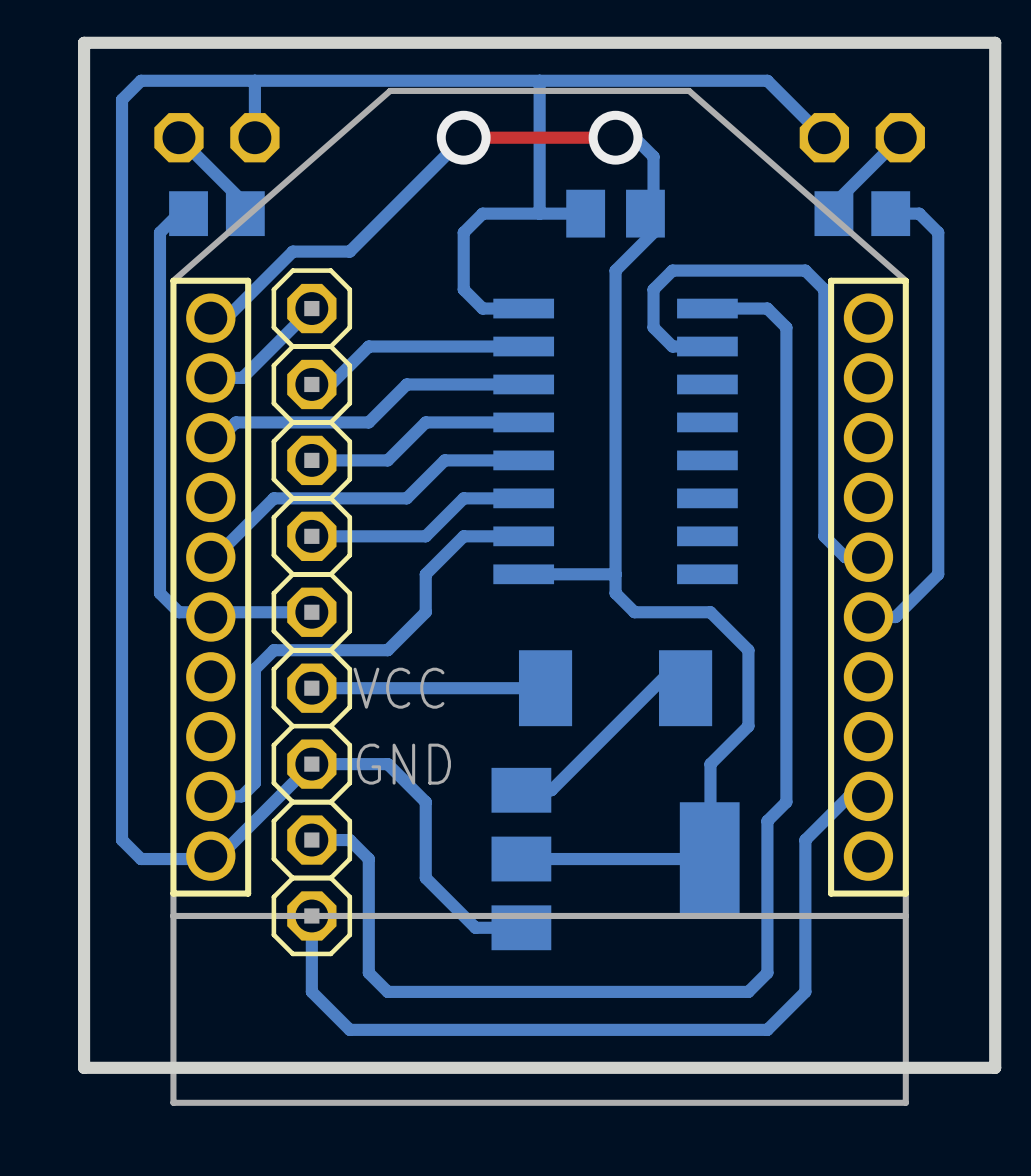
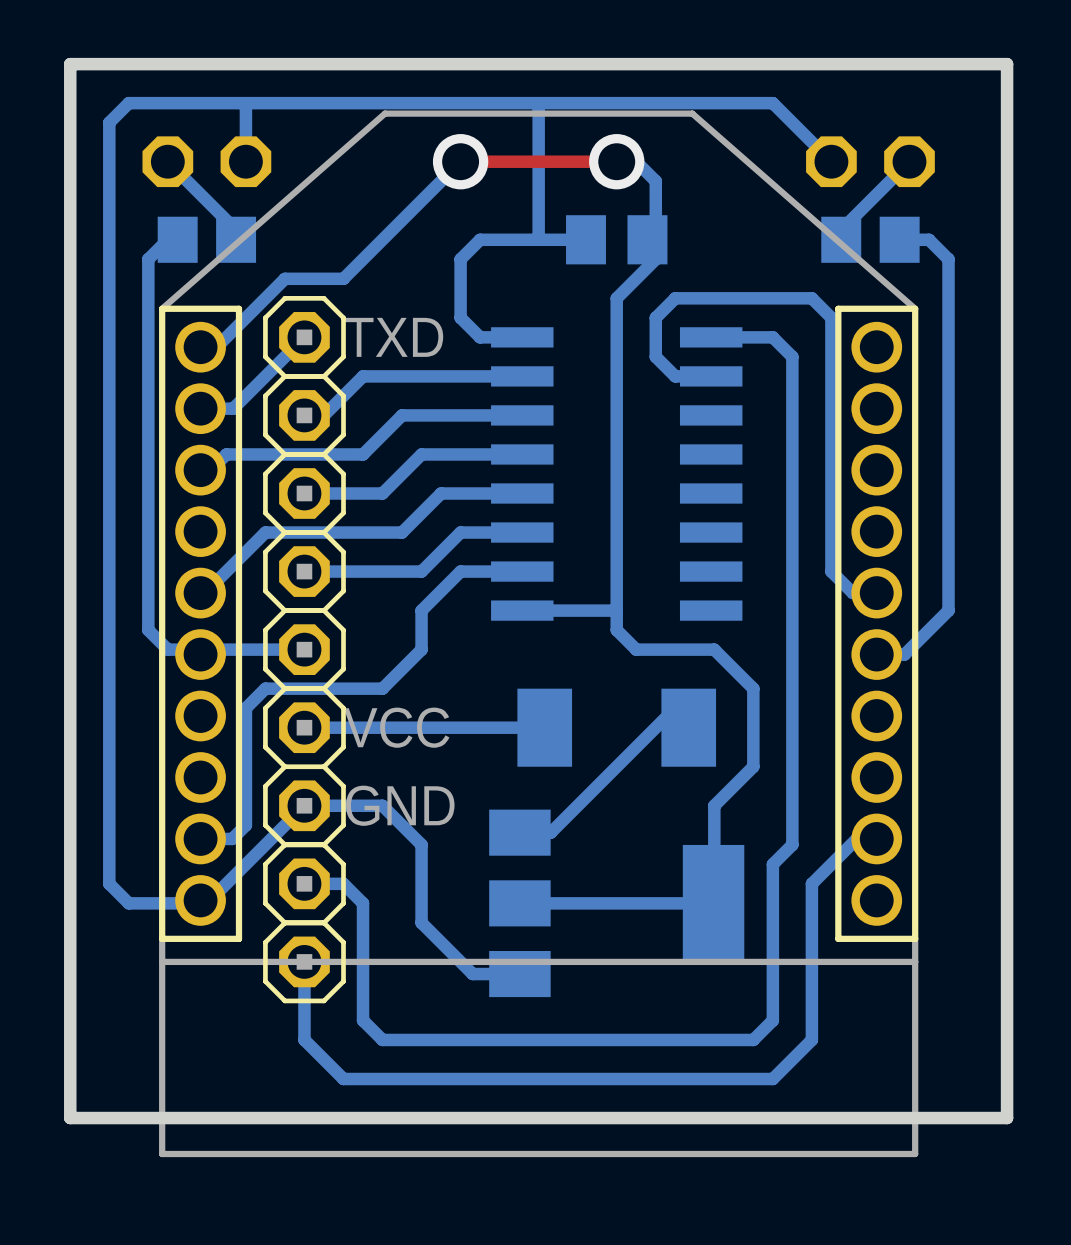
part value: none -> TXD (393, 337)

